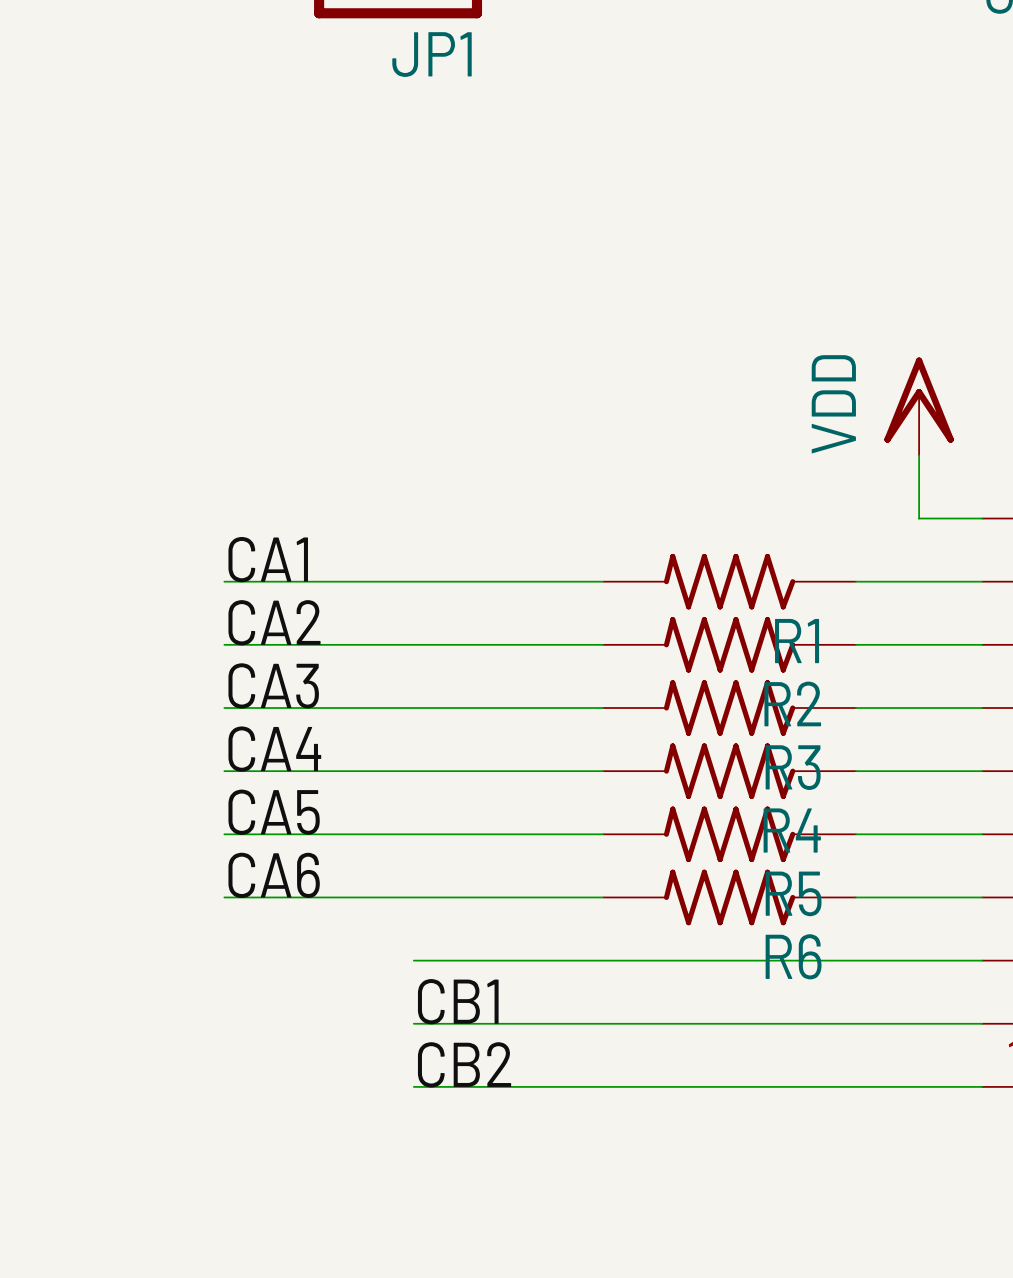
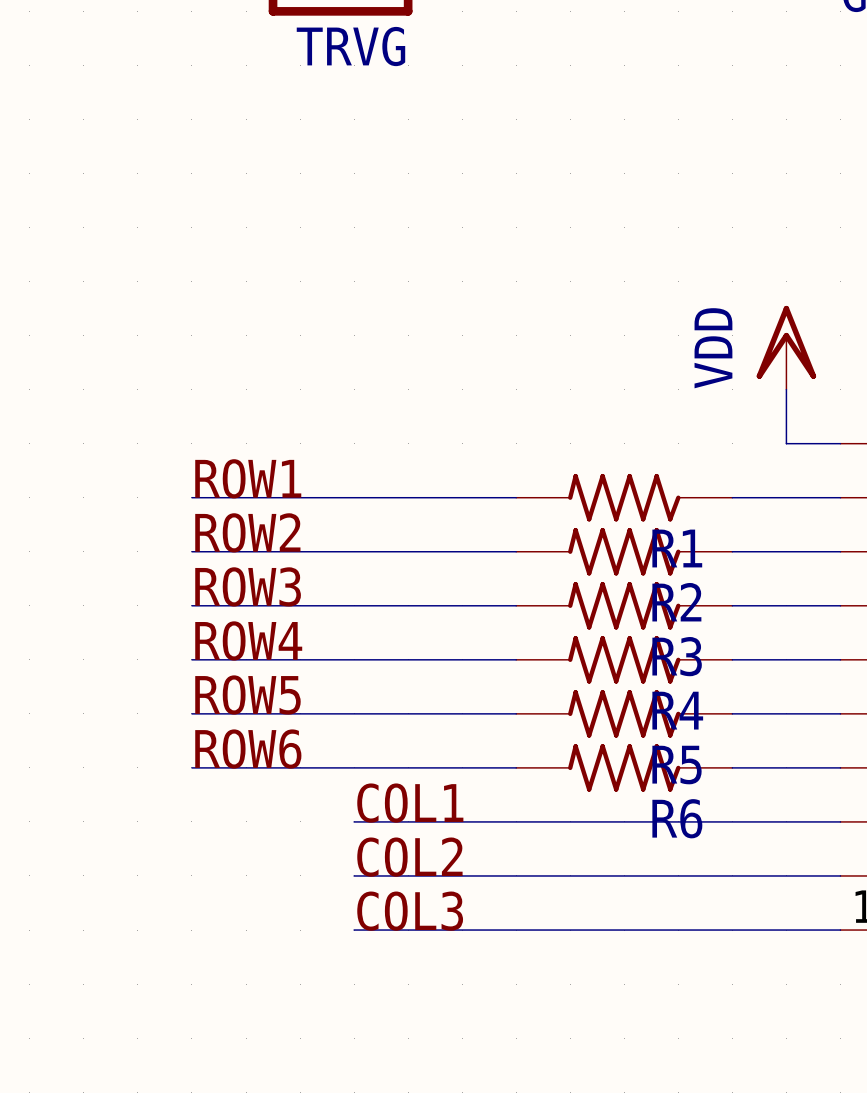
JP1 name: JP1 (432, 54) -> TRVG (350, 46)
label: CA1 (268, 559) -> ROW1 (248, 478)
label: CA2 (274, 622) -> ROW2 (247, 532)
label: CA3 (273, 685) -> ROW3 (248, 586)
label: CA4 (274, 749) -> ROW4 (248, 640)
label: CA5 (274, 812) -> ROW5 (247, 694)
label: CA6 (274, 875) -> ROW6 (248, 749)
label: none -> COL1 (410, 803)
label: CB1 (458, 1001) -> COL2 (409, 857)
label: CB2 (464, 1064) -> COL3 (410, 911)

